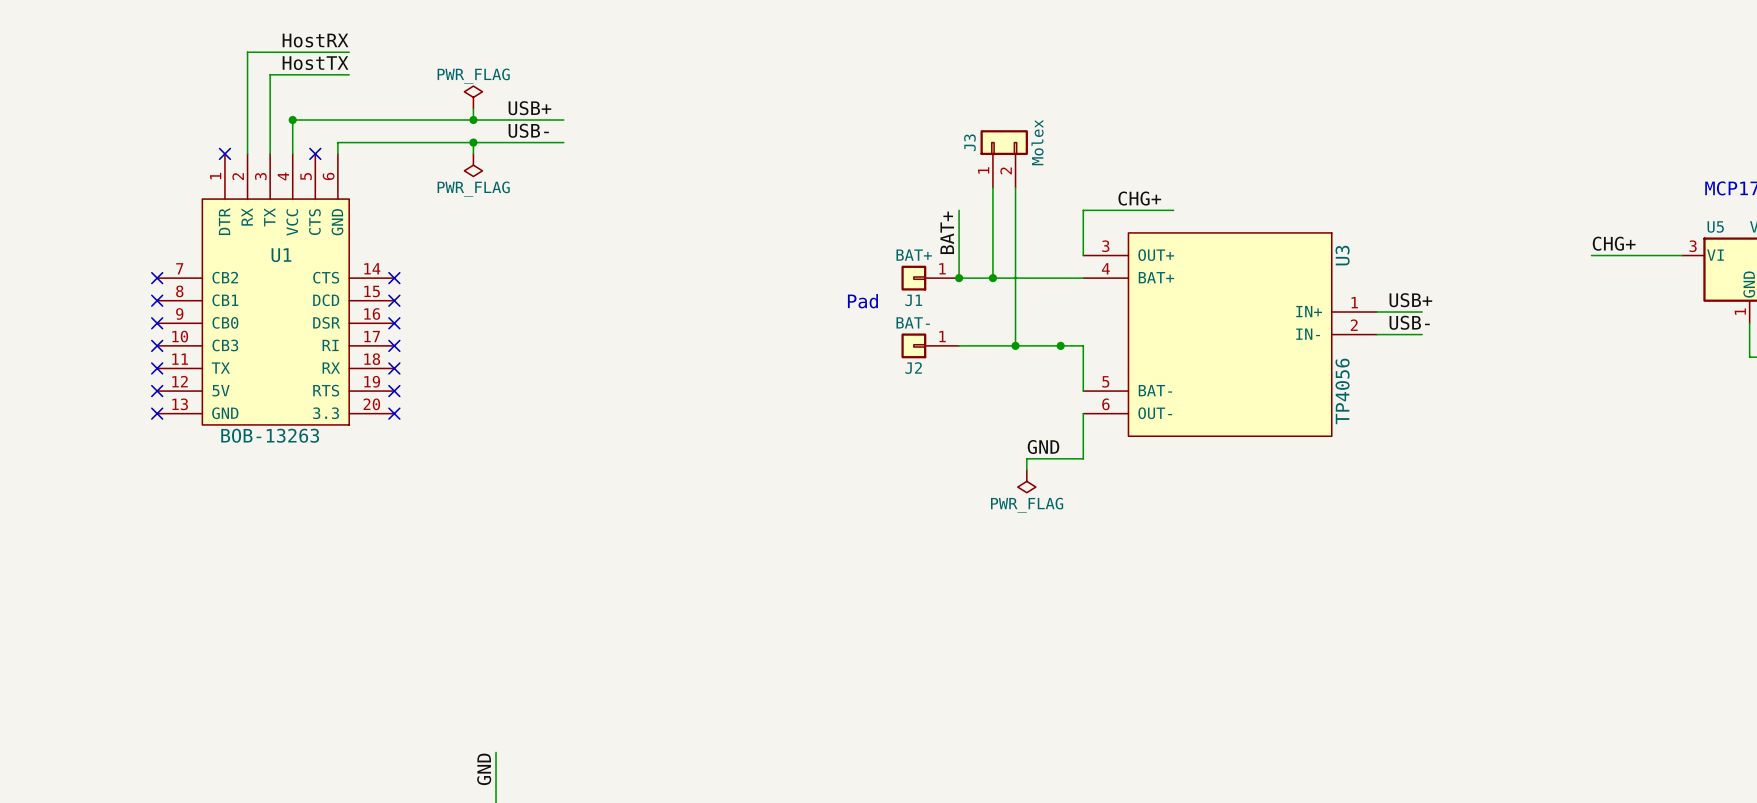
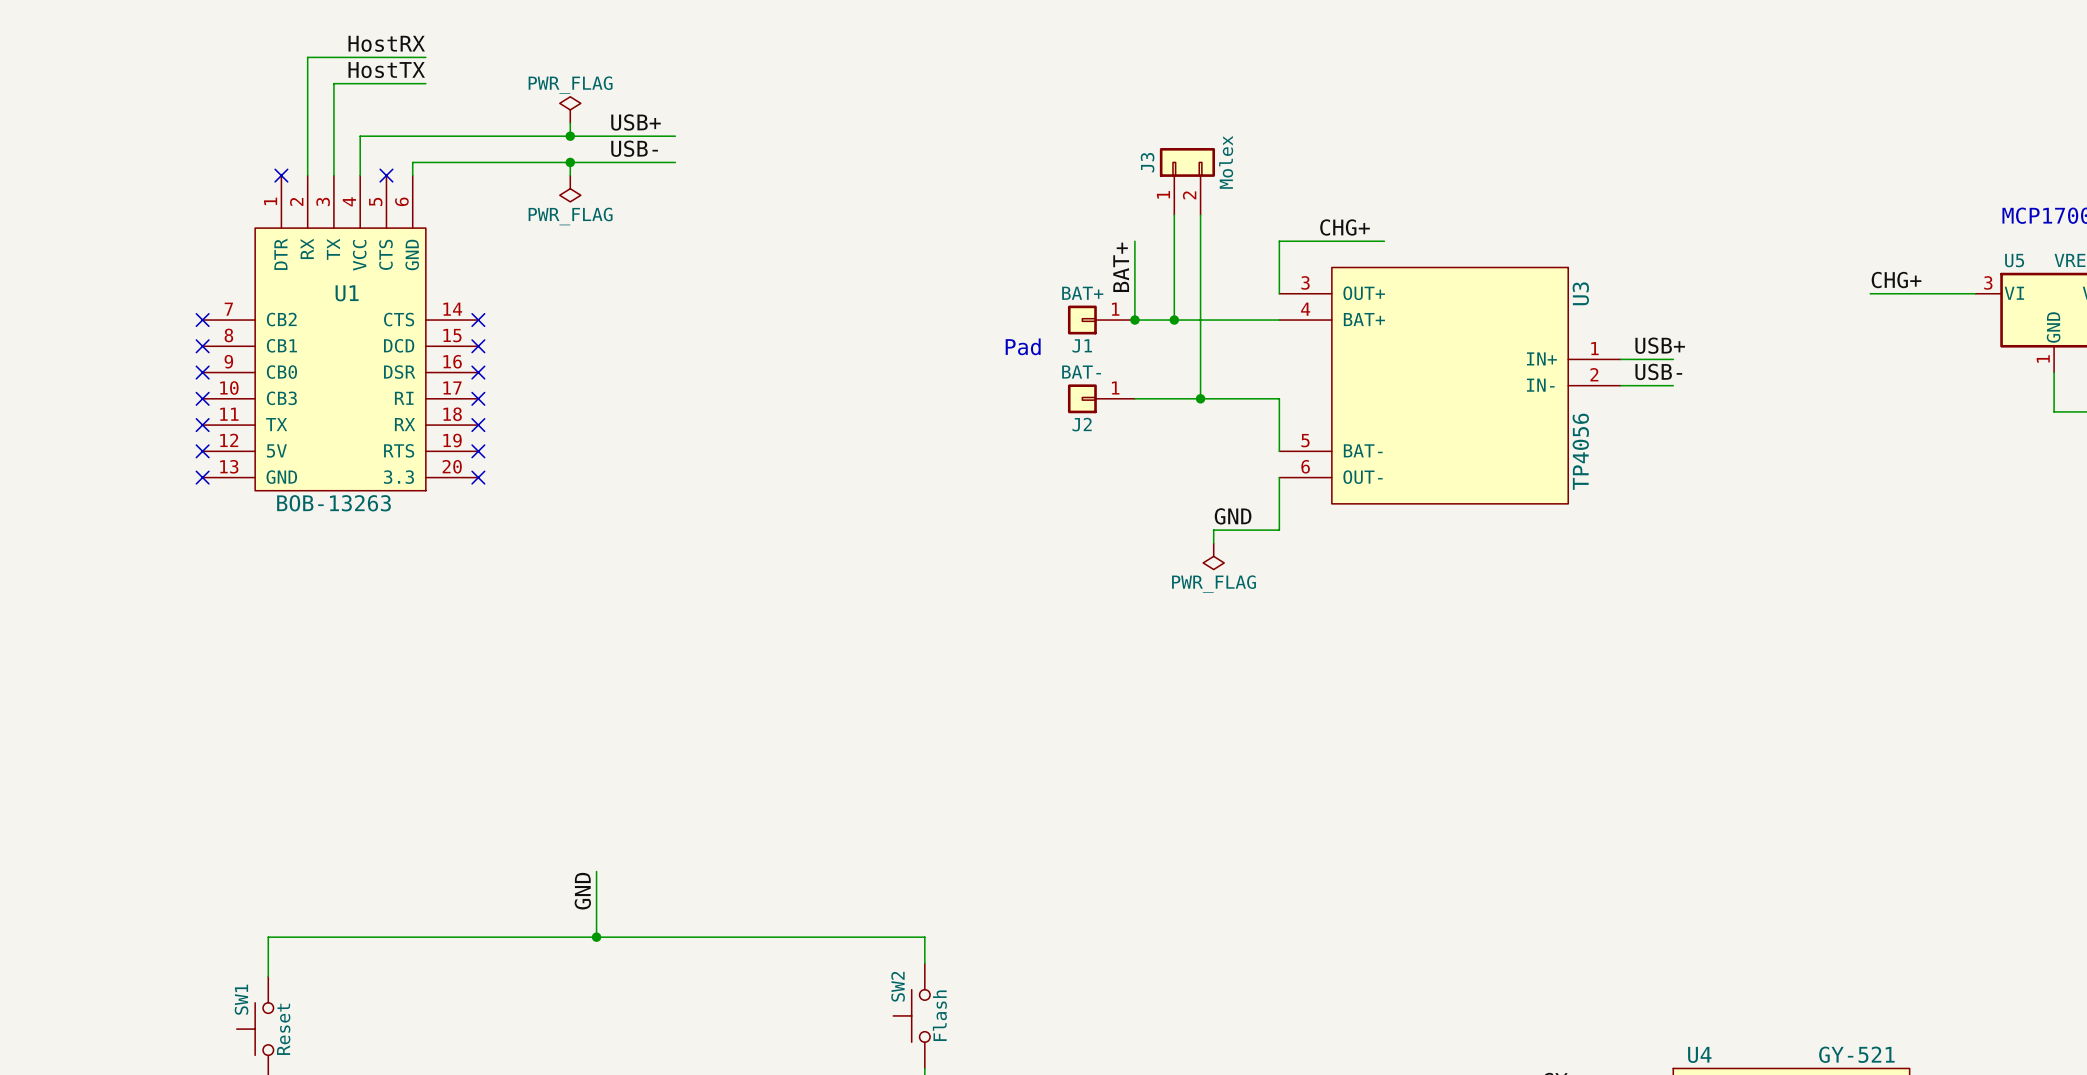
junction: (292, 120) -> none
junction: (1060, 345) -> none

